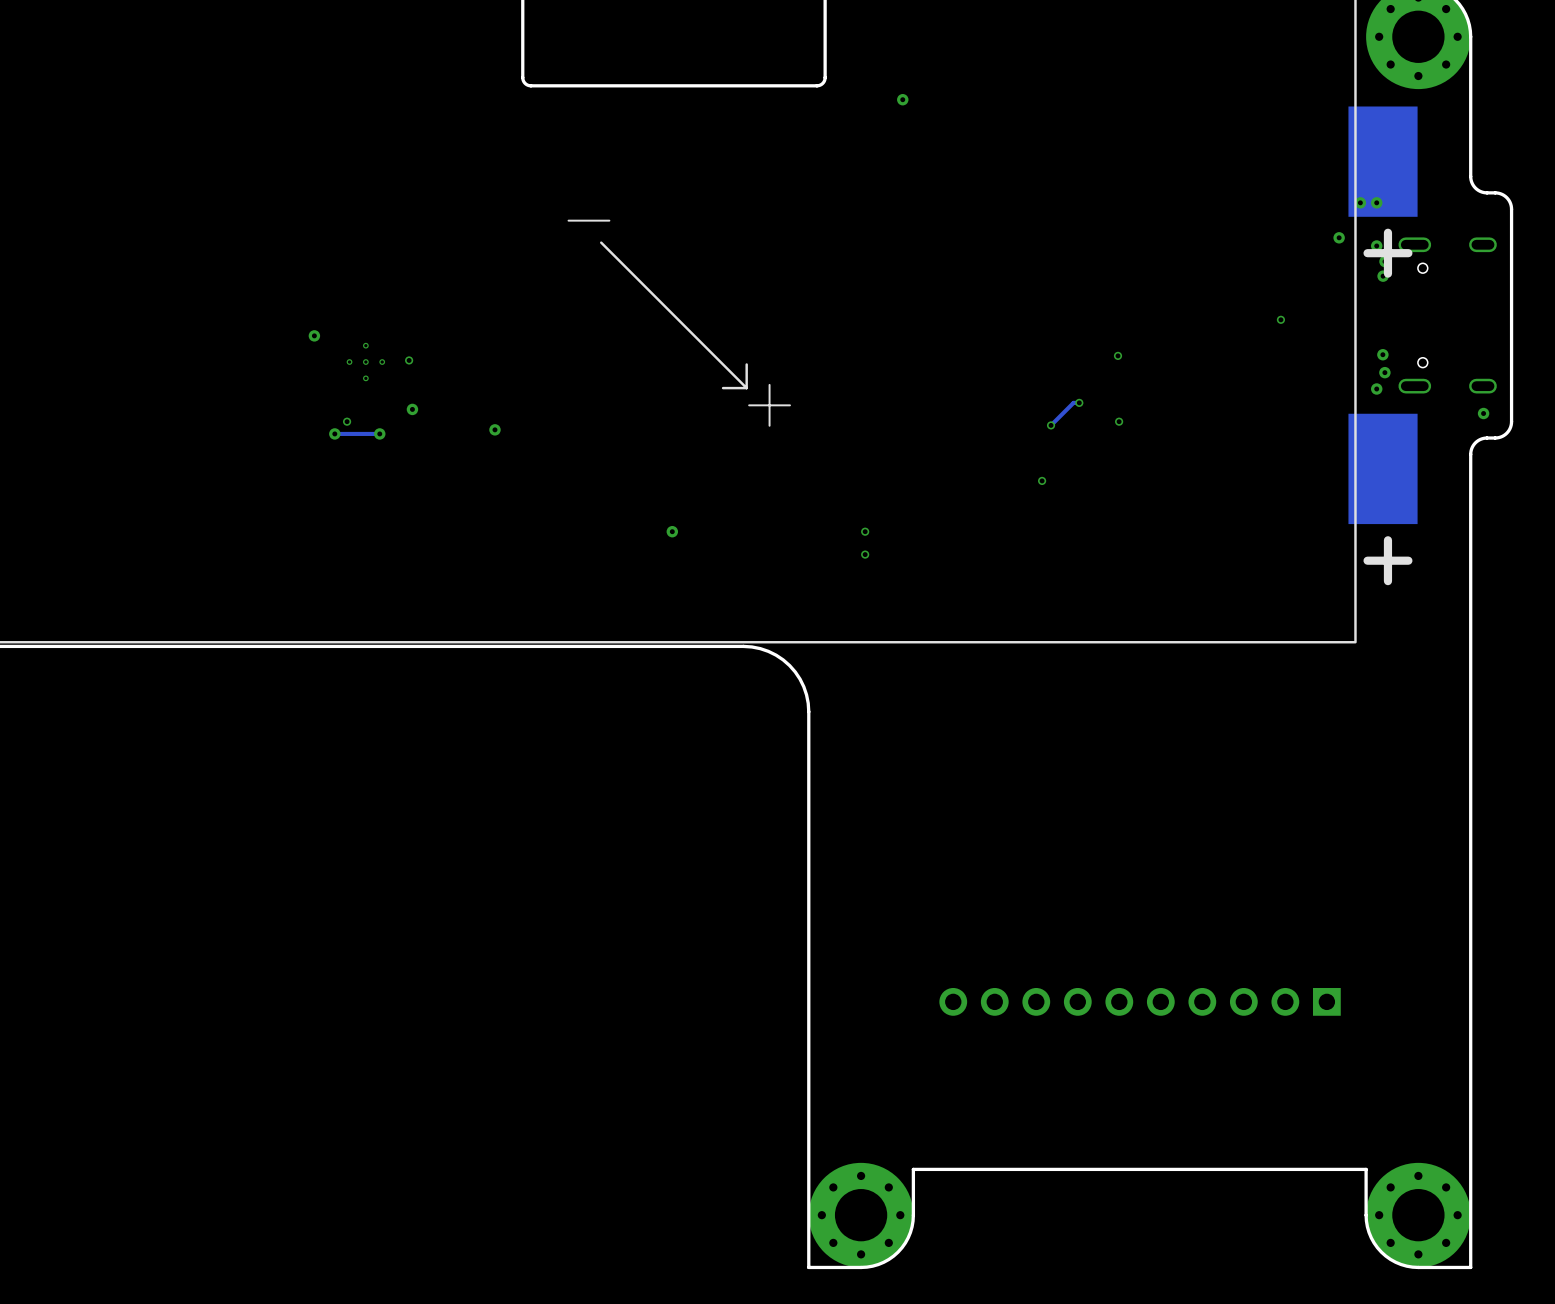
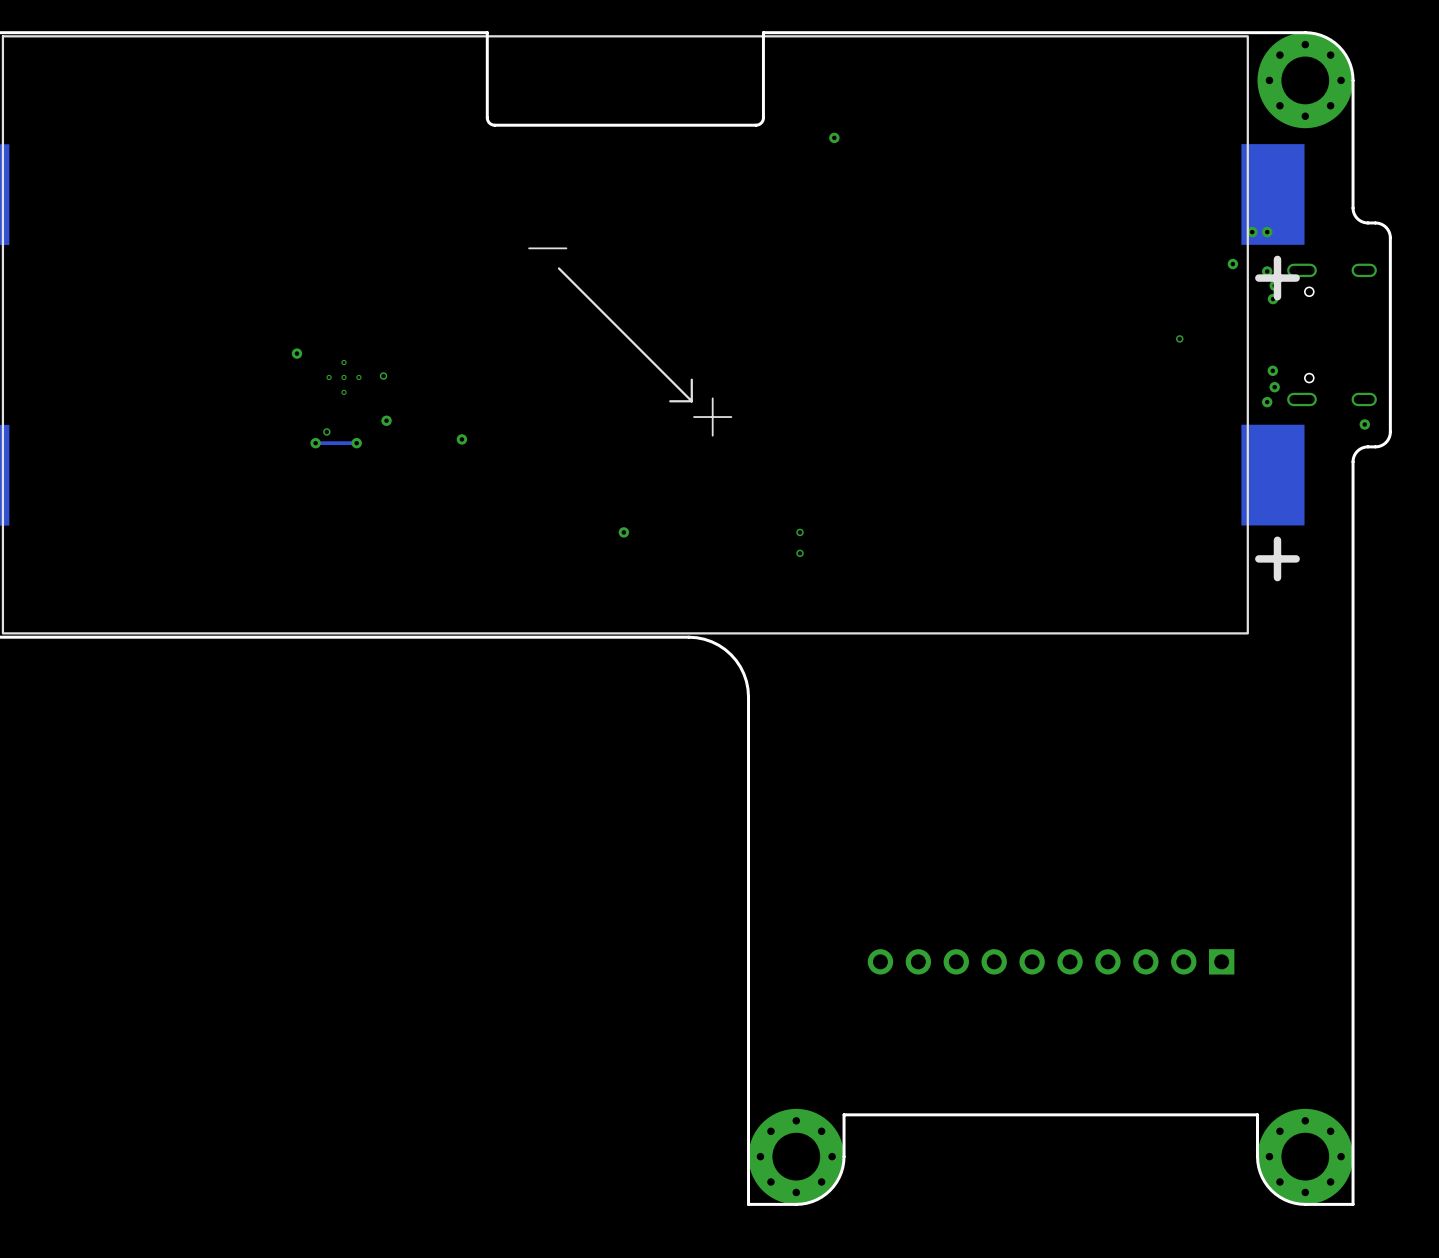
via: (1117, 355) -> none
track: (1079, 402) (1073, 402) (1051, 425) -> none
via: (1079, 402) -> none
via: (1119, 421) -> none
via: (1051, 425) -> none
via: (1042, 480) -> none

